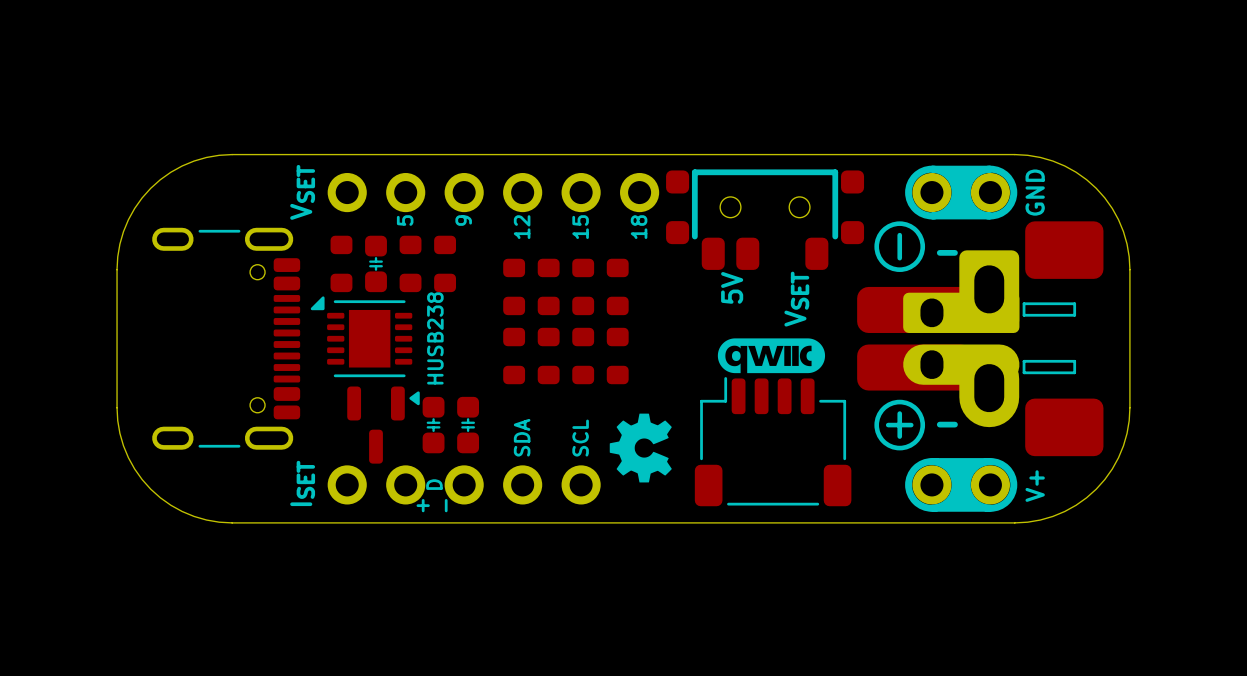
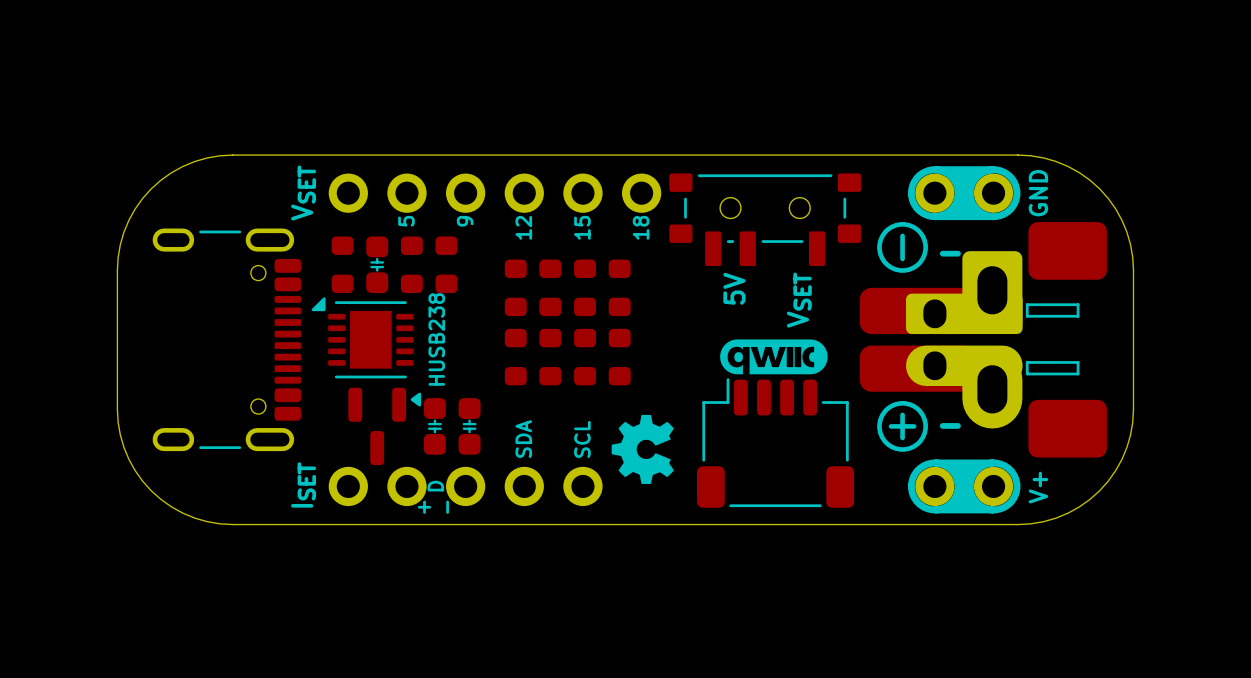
part footprint: [666, 169, 865, 270] -> [669, 173, 861, 267]

